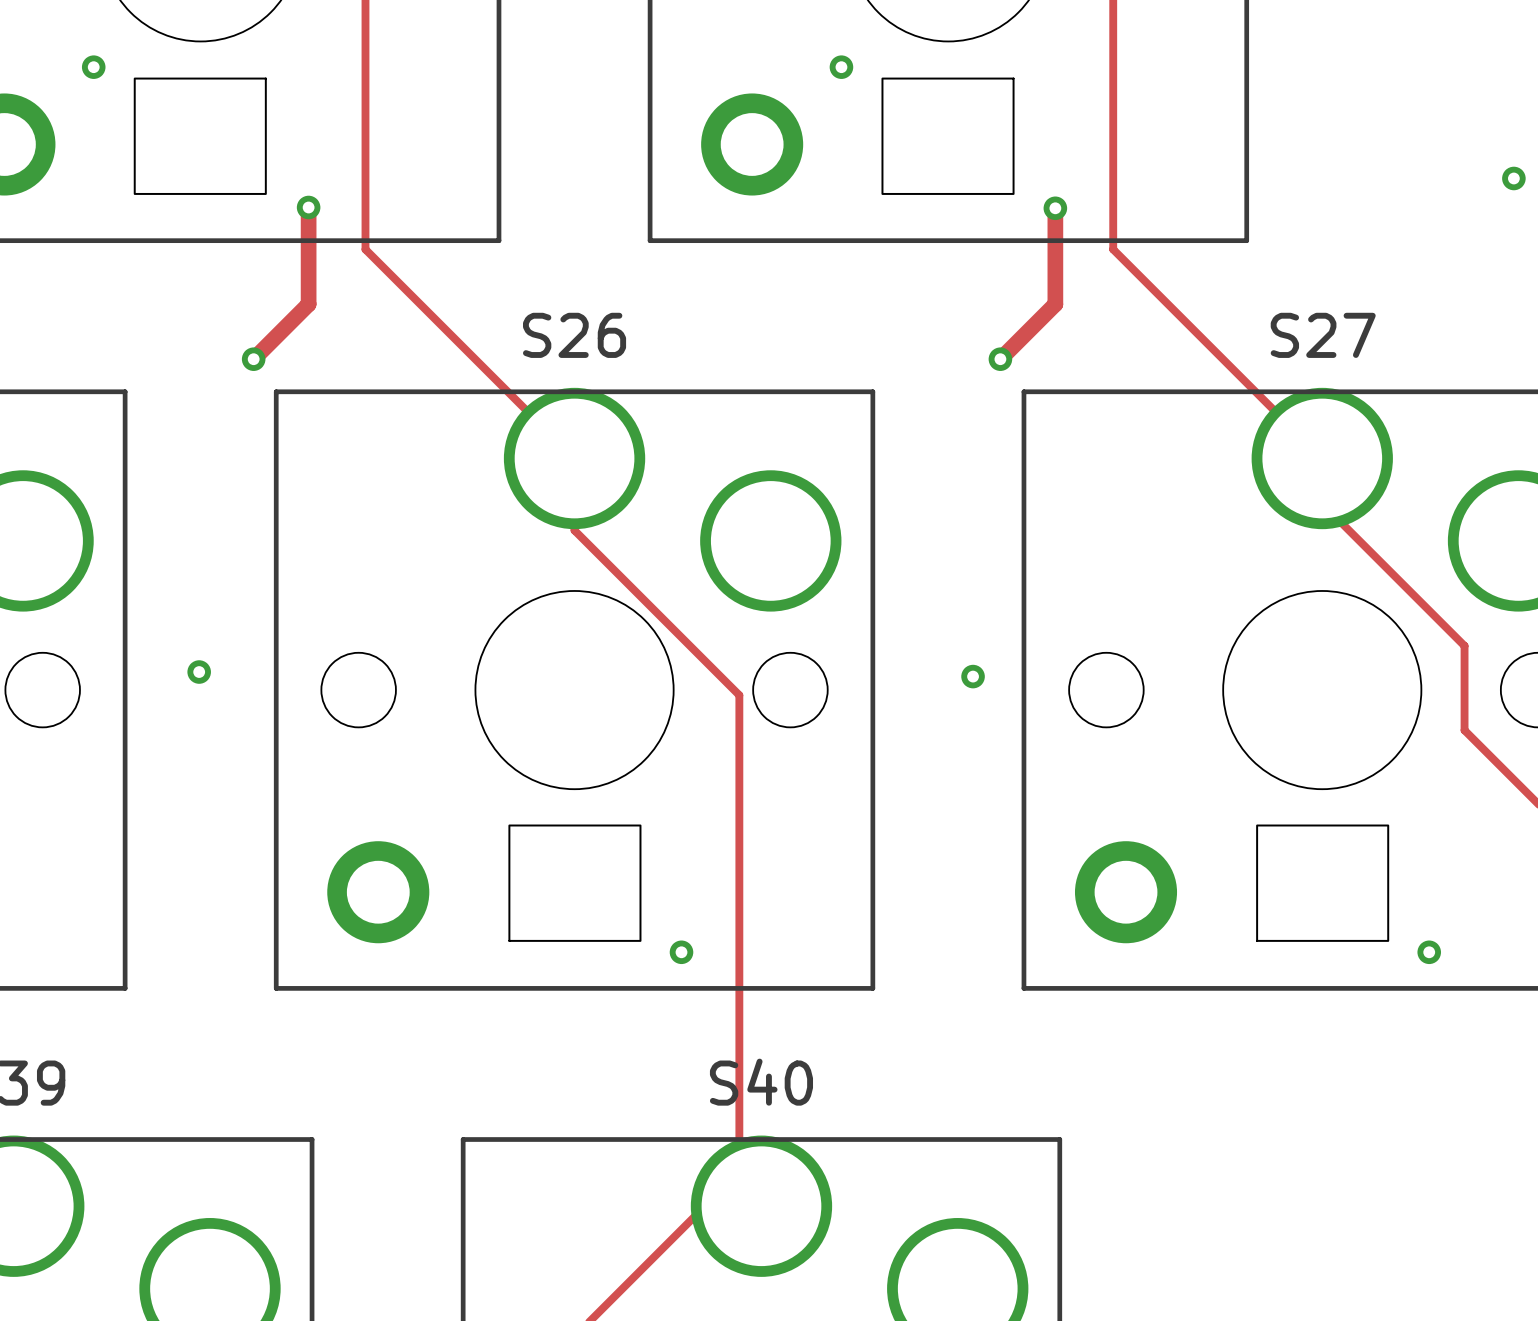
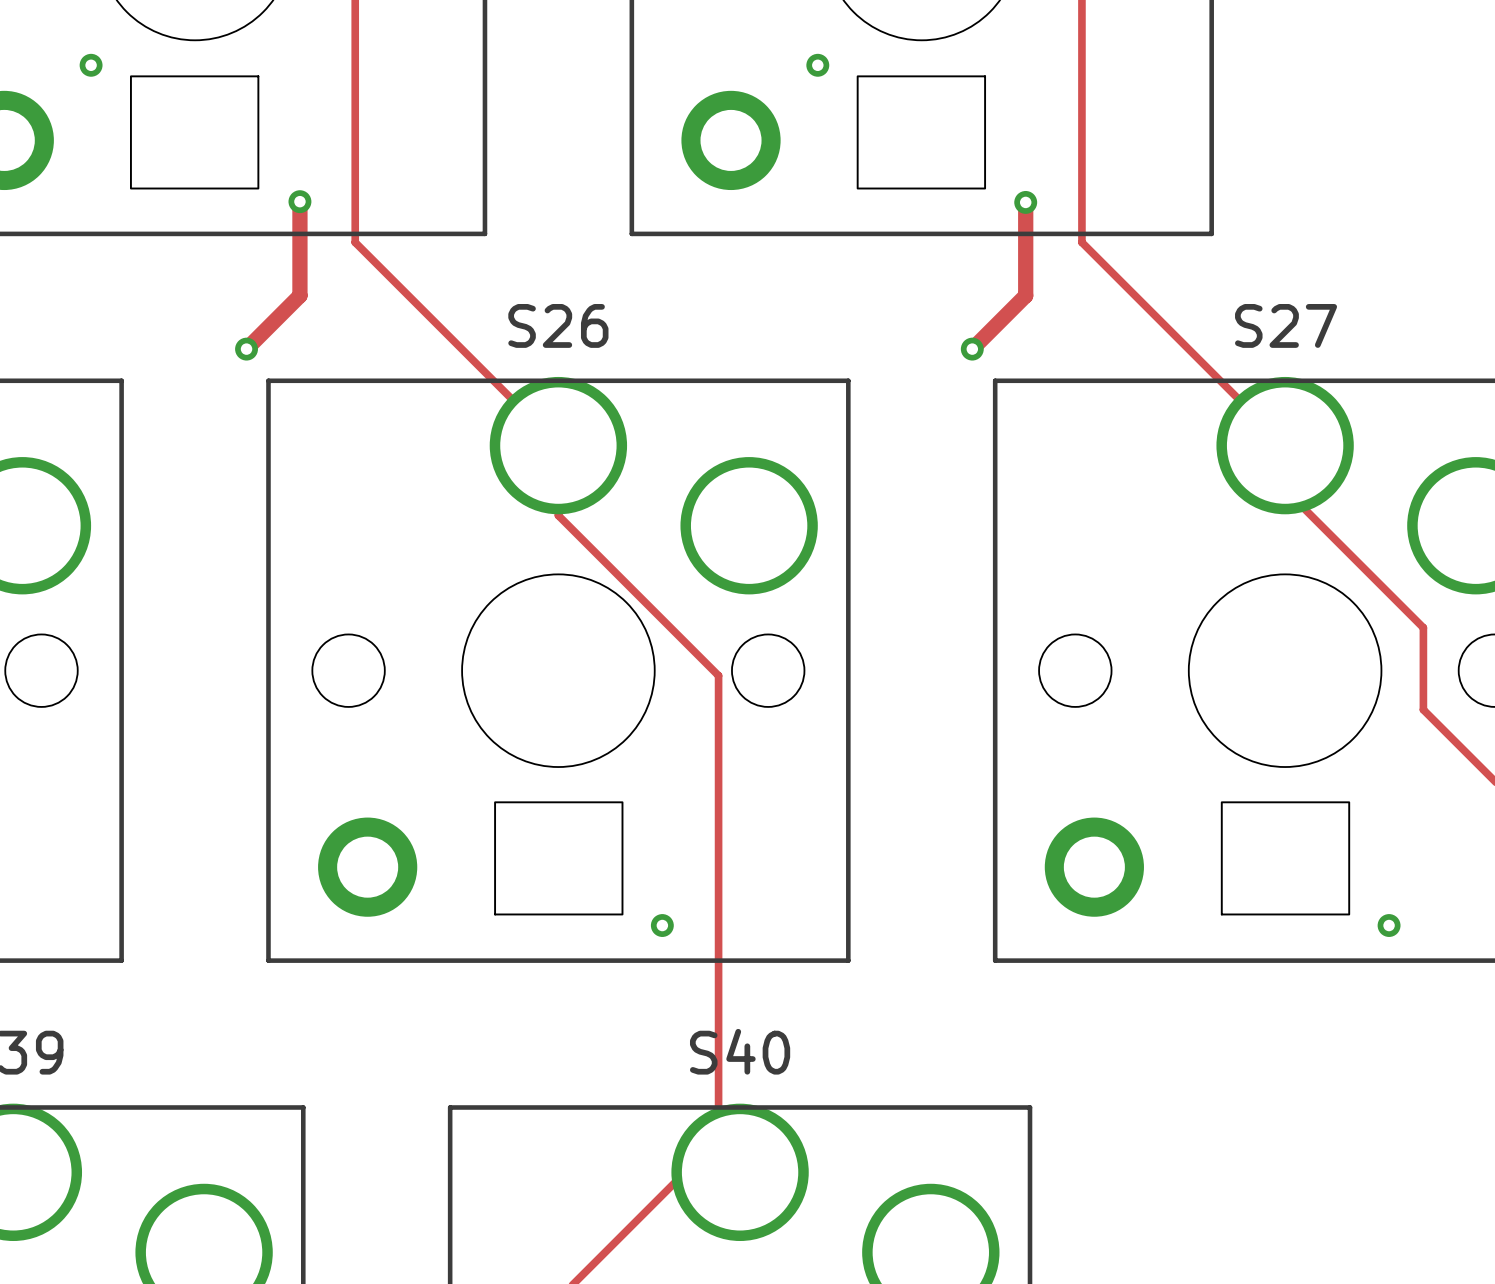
via: (1513, 178) -> none
via: (199, 672) -> none
via: (973, 676) -> none

